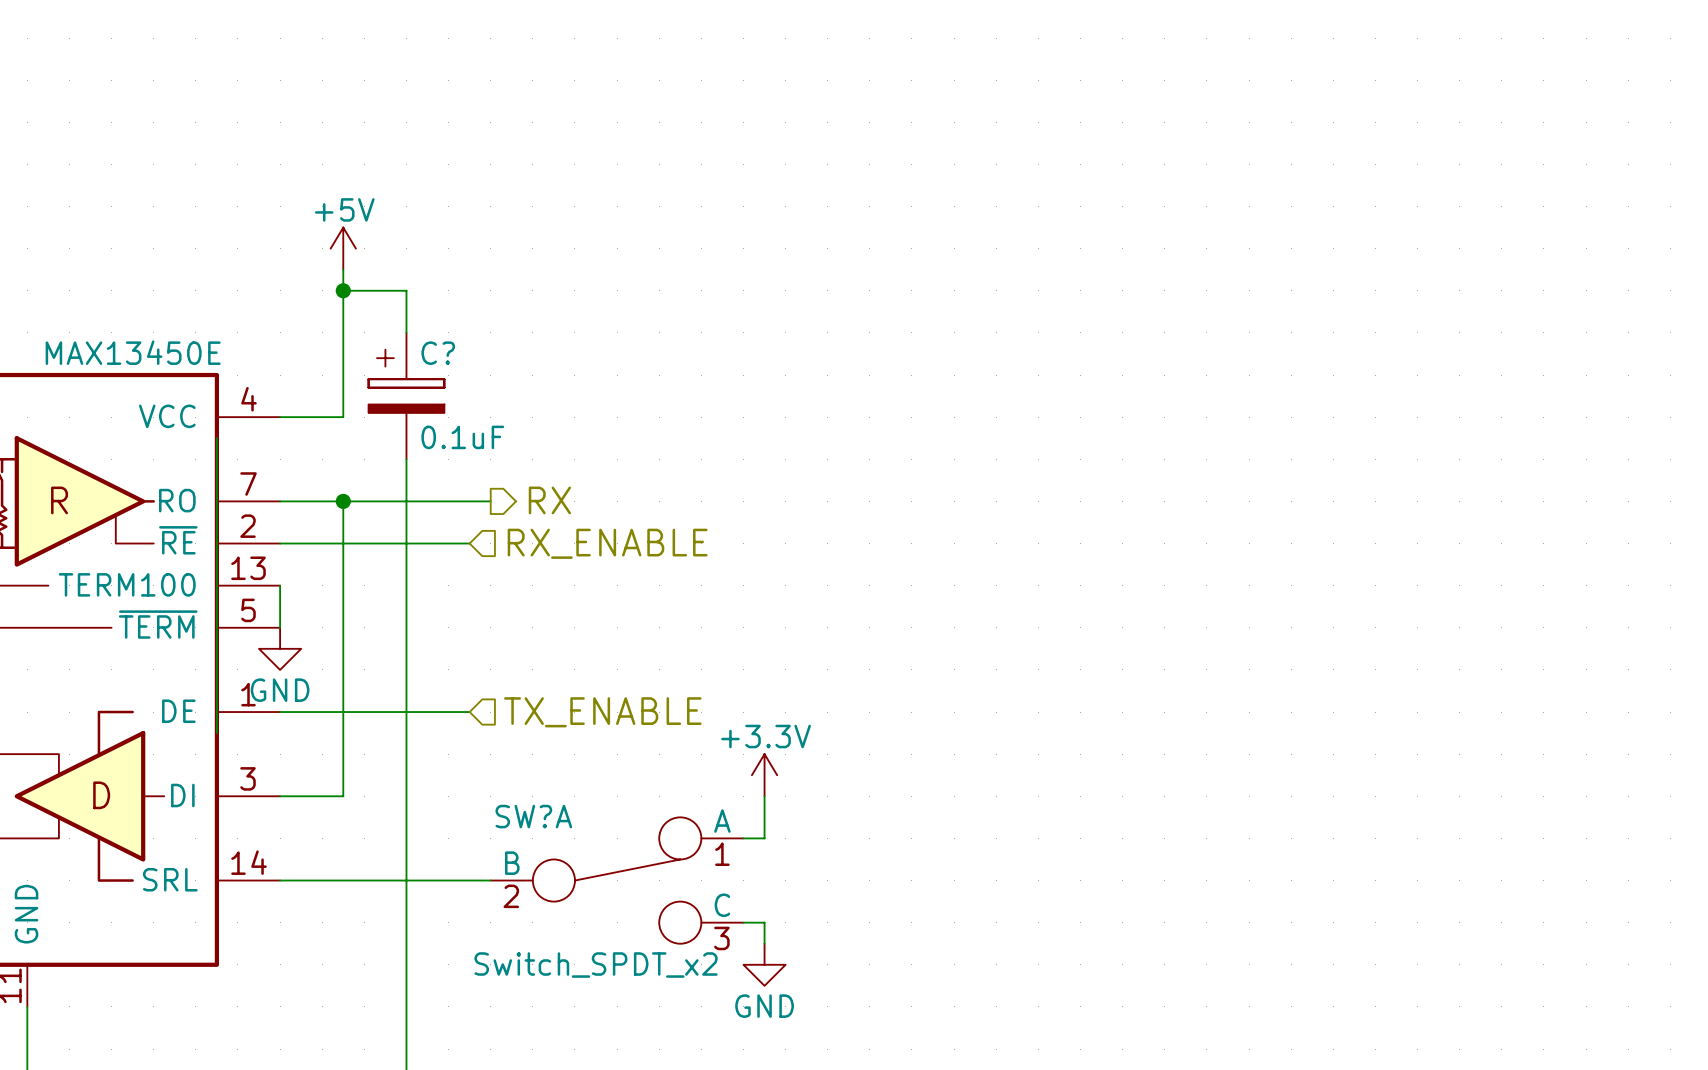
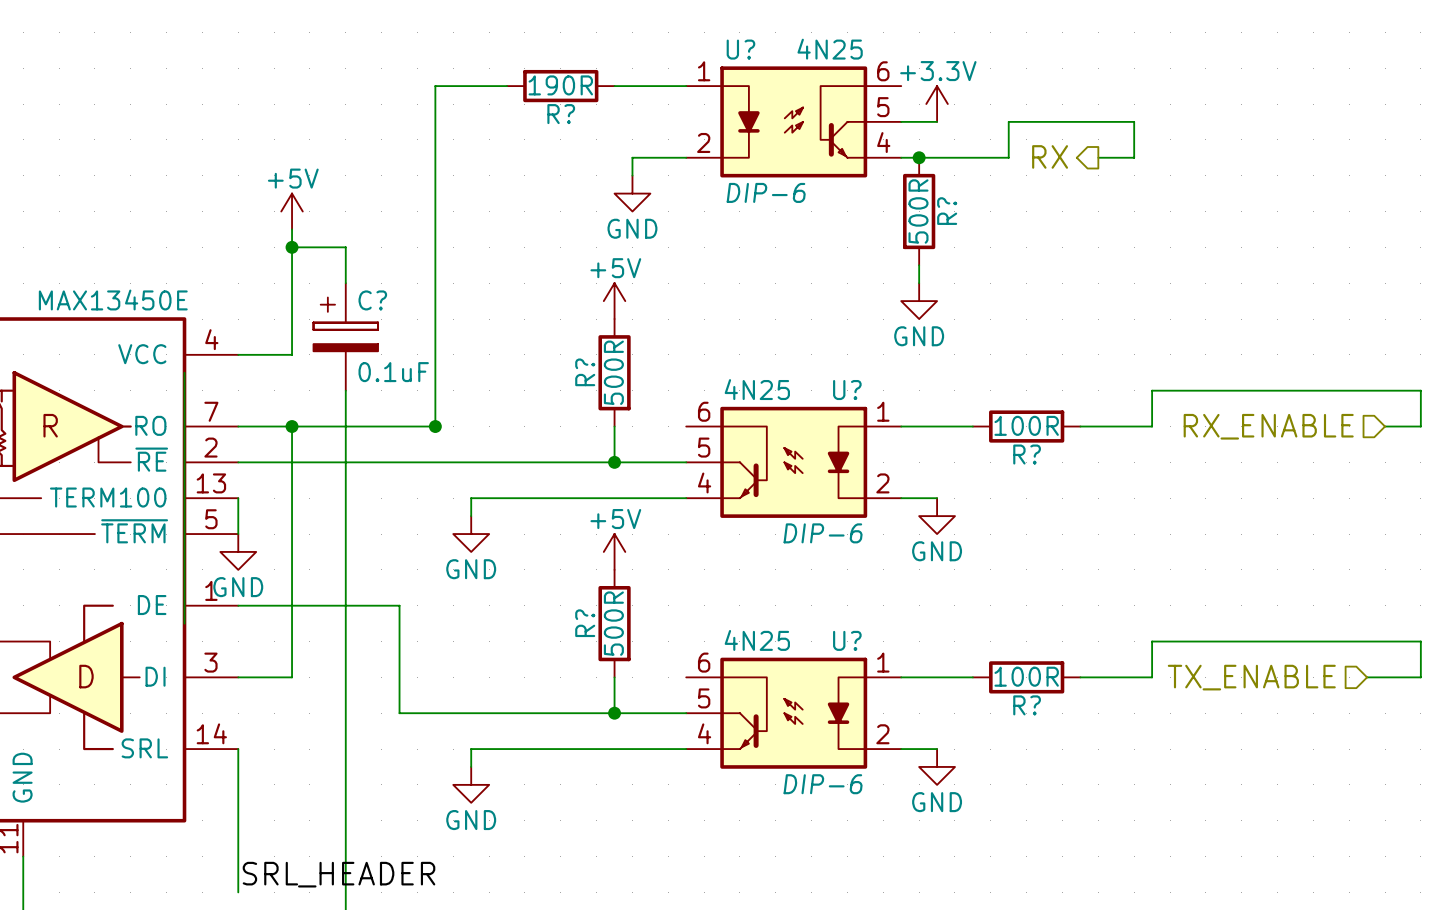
wire: none -> (507, 86) (435, 86) (435, 426) (417, 426)
R?: none -> 190R (560, 86)
wire: none -> (614, 86) (686, 86)
power symbol: none -> +3.3V (937, 104)
U?: none -> 4N25 (793, 121)
wire: none -> (901, 121) (937, 121)
hierarchical label: none -> RX (1050, 156)
wire: none -> (686, 157) (632, 157) (632, 175)
wire: none -> (901, 157) (1008, 157) (1008, 121) (1134, 121) (1134, 157) (1098, 157)
junction: none -> (919, 157)
power symbol: none -> GND (632, 193)
R?: none -> 500R (919, 211)
wire: none -> (919, 265) (919, 283)
power symbol: none -> +5V (614, 301)
power symbol: none -> GND (919, 301)
R?: none -> 500R (614, 372)
hierarchical label: RX (549, 500) -> none
junction: none -> (435, 426)
wire: none -> (614, 426) (614, 462)
wire: none -> (901, 426) (972, 426)
R?: none -> 100R (1026, 426)
wire: none -> (1080, 426) (1152, 426) (1152, 390) (1420, 390) (1420, 426) (1385, 426)
hierarchical label: none -> RX_ENABLE (1268, 426)
wire: none -> (399, 462) (686, 462)
hierarchical label: RX_ENABLE (607, 543) -> none
junction: none -> (614, 462)
U?: none -> 4N25 (793, 462)
wire: none -> (686, 498) (471, 498) (471, 516)
wire: none -> (901, 498) (937, 498)
power symbol: none -> GND (937, 516)
power symbol: none -> GND (471, 534)
power symbol: none -> +5V (614, 551)
wire: none -> (399, 605) (399, 713) (632, 713)
hierarchical label: TX_ENABLE (602, 712) -> none
R?: none -> 500R (614, 623)
power symbol: +3.3V (764, 775) -> none
wire: none -> (614, 677) (614, 713)
wire: (764, 796) (764, 838) -> (686, 713) (650, 713)
wire: none -> (901, 677) (972, 677)
R?: none -> 100R (1026, 677)
wire: none -> (1080, 677) (1152, 677) (1152, 641) (1420, 641) (1420, 677) (1367, 677)
hierarchical label: none -> TX_ENABLE (1251, 677)
junction: none -> (614, 713)
U?: none -> 4N25 (793, 713)
wire: (280, 880) (490, 880) -> (238, 749) (238, 892)
SW?A: Switch_SPDT_x2 (617, 880) -> none
wire: none -> (686, 749) (471, 749) (471, 766)
wire: none -> (901, 749) (937, 749)
power symbol: none -> GND (937, 766)
power symbol: none -> GND (471, 784)
wire: (743, 922) (764, 922) (764, 943) -> none
power symbol: GND (764, 964) -> none
label: none -> SRL_HEADER (339, 874)

